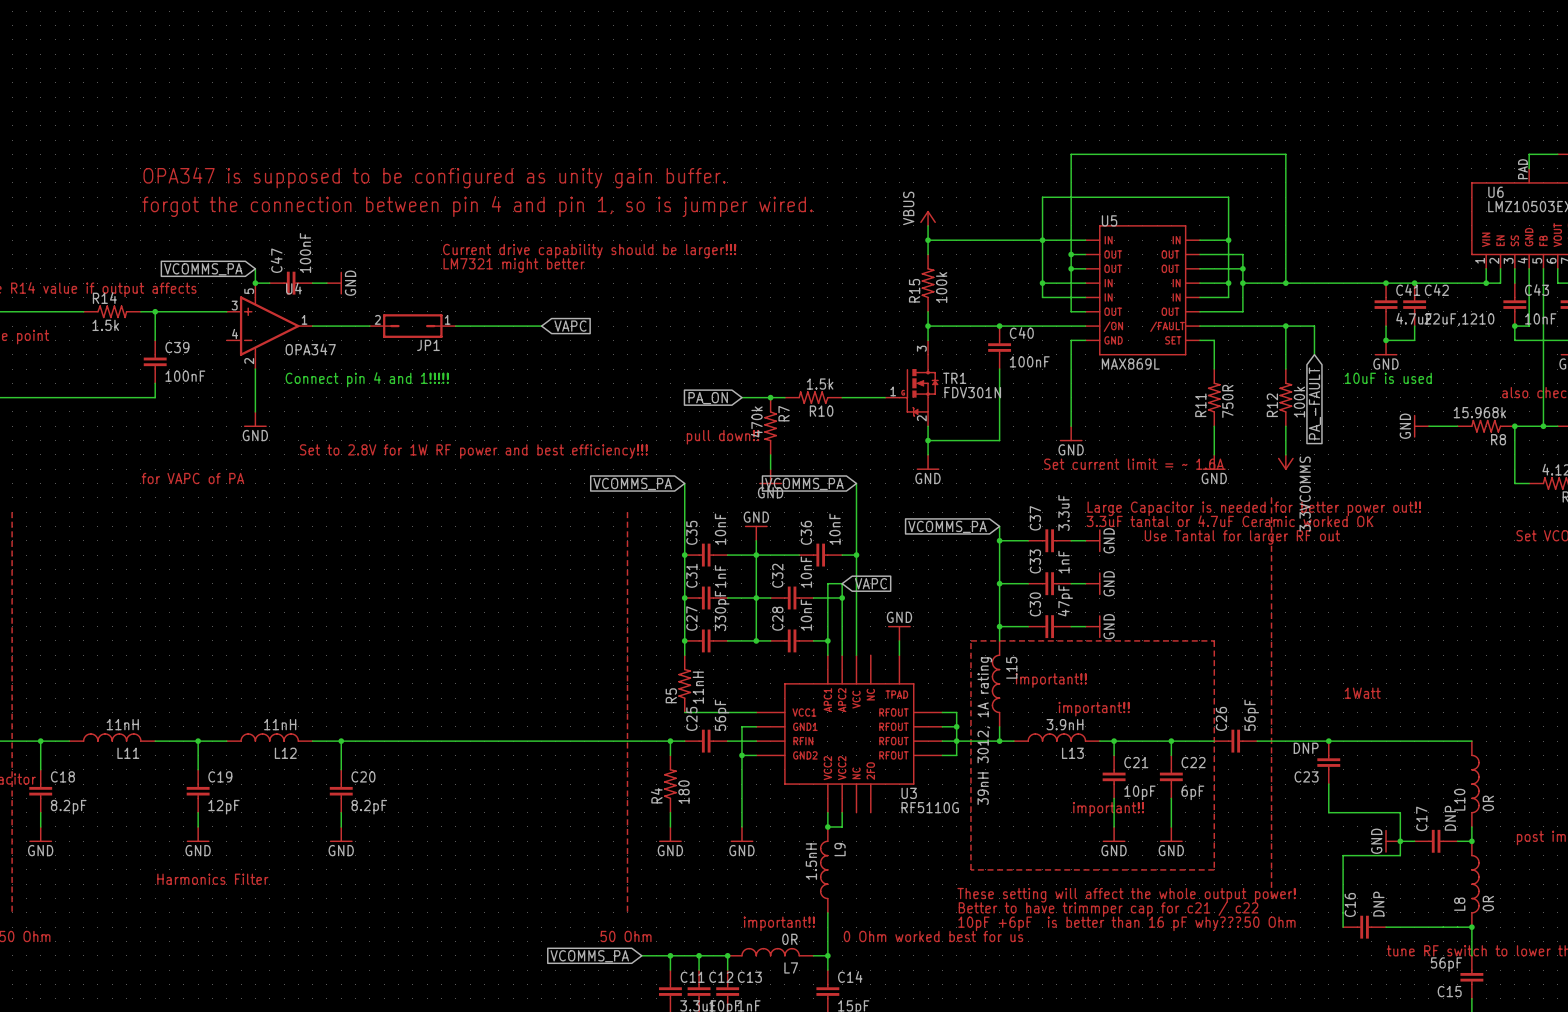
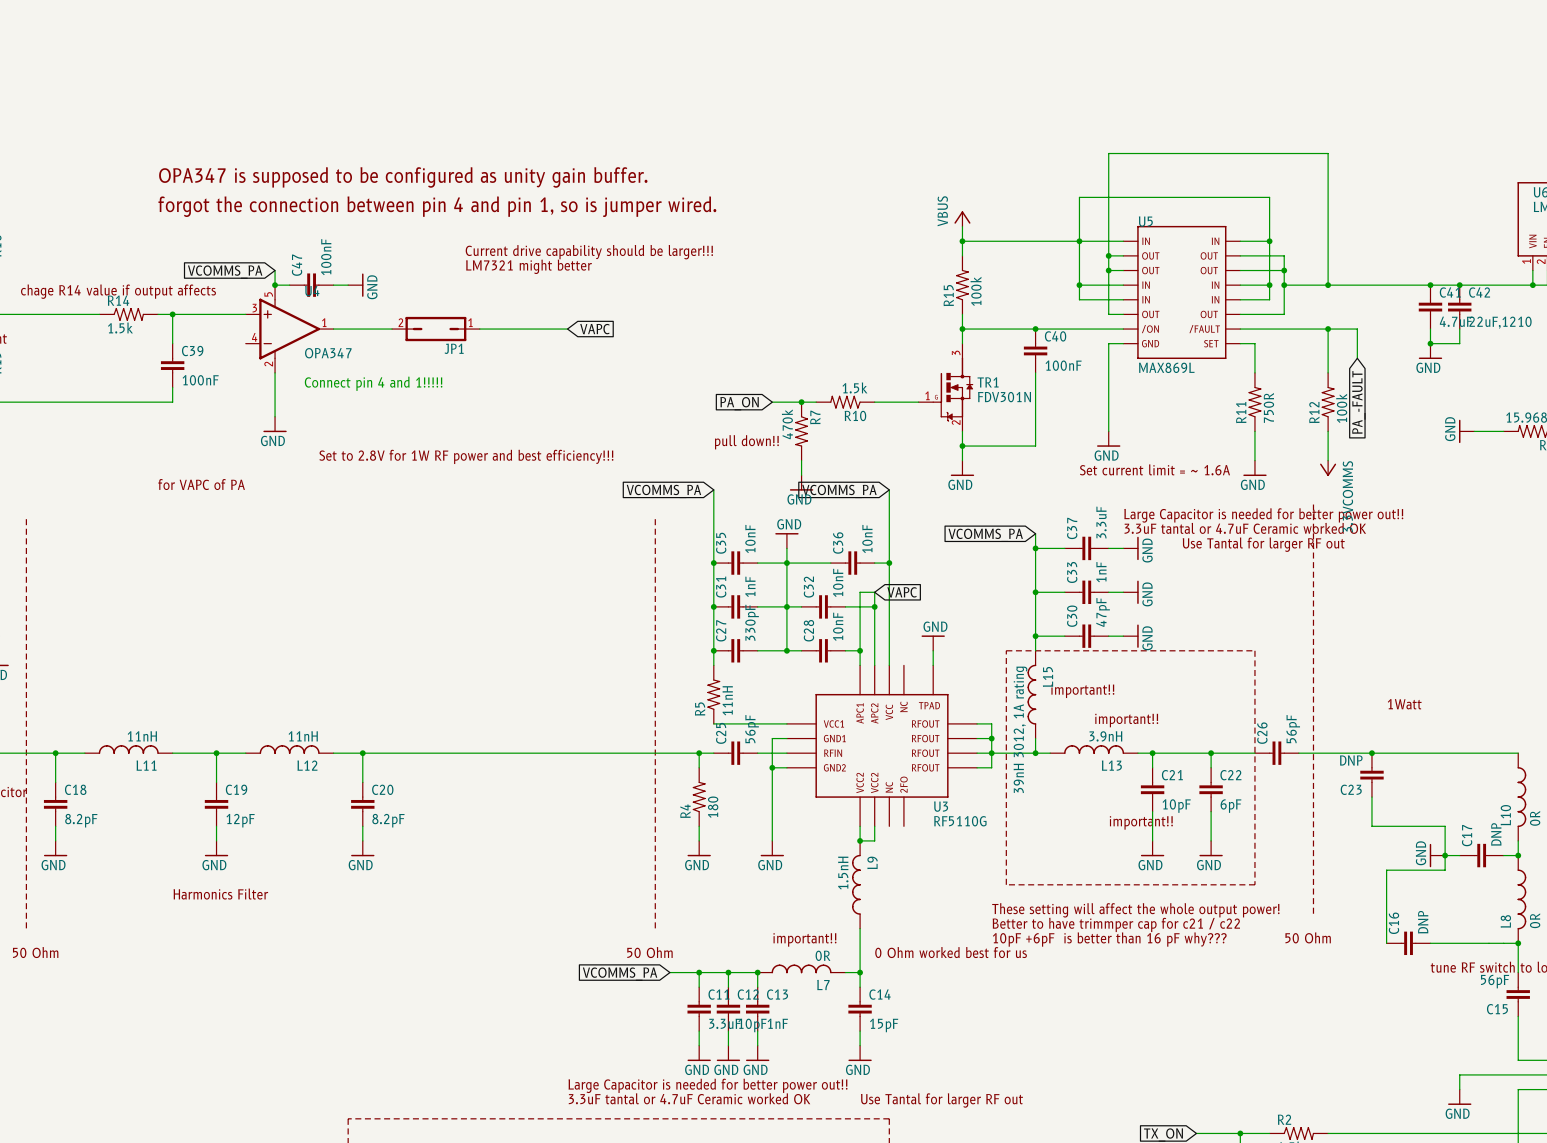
text: 10uF is used (1388, 378) -> none

